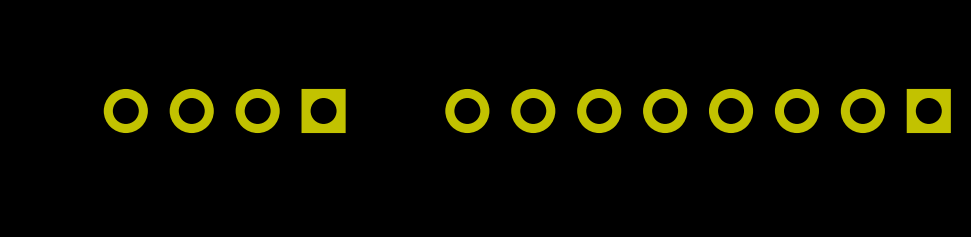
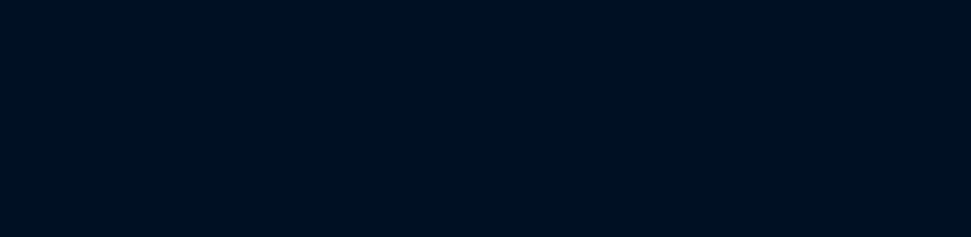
part: (224, 110) -> none
part: (698, 110) -> none

